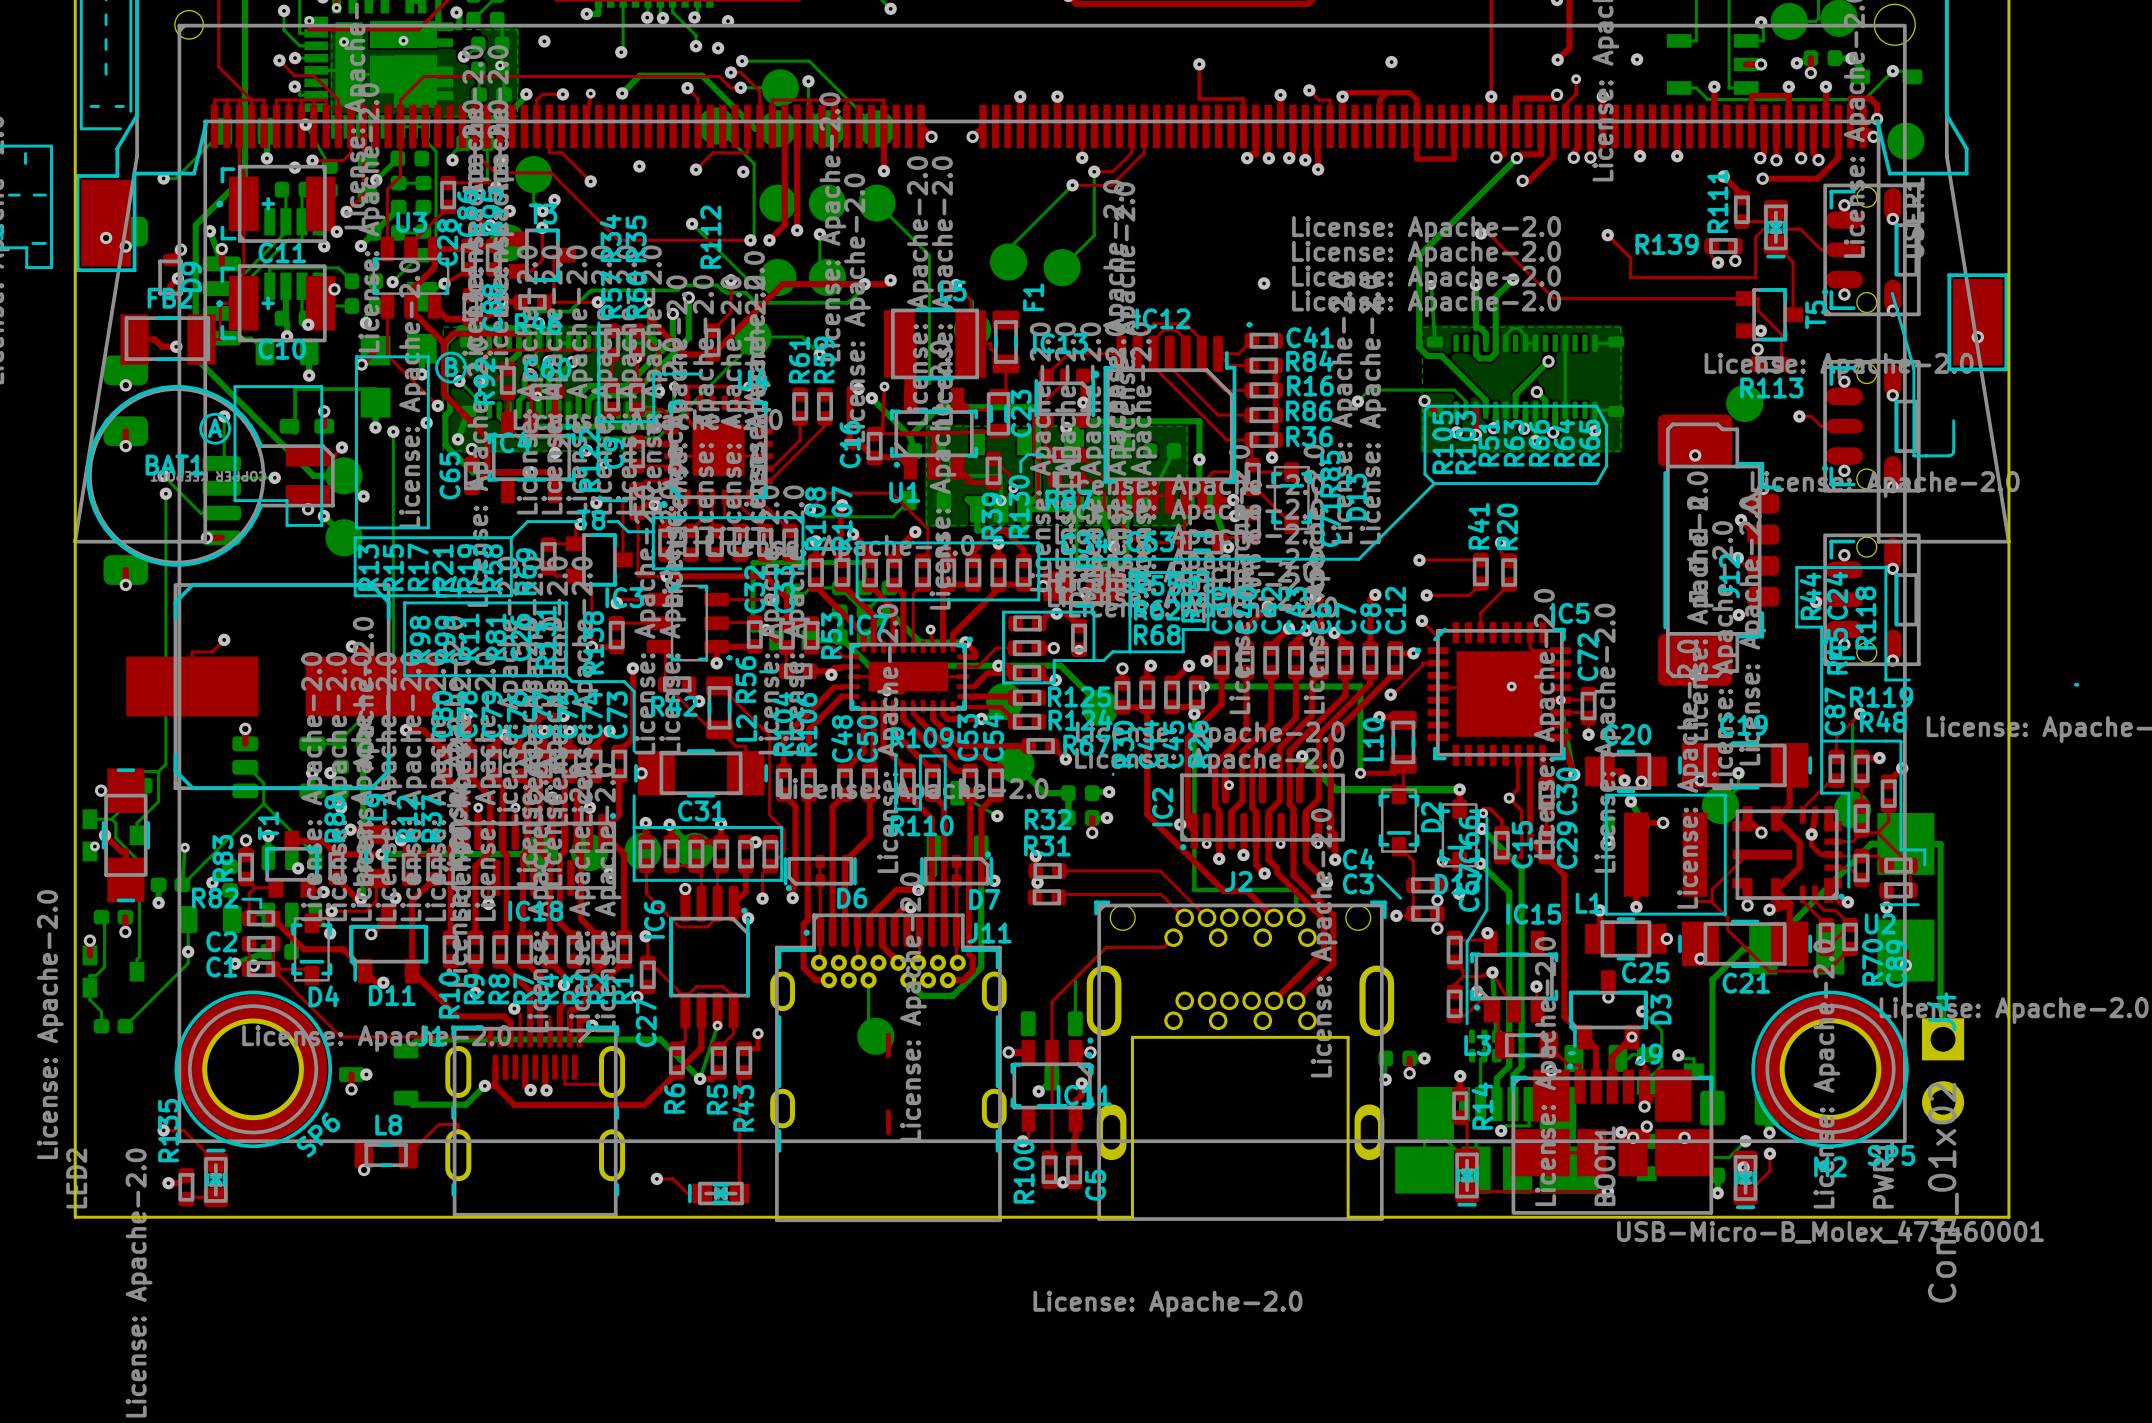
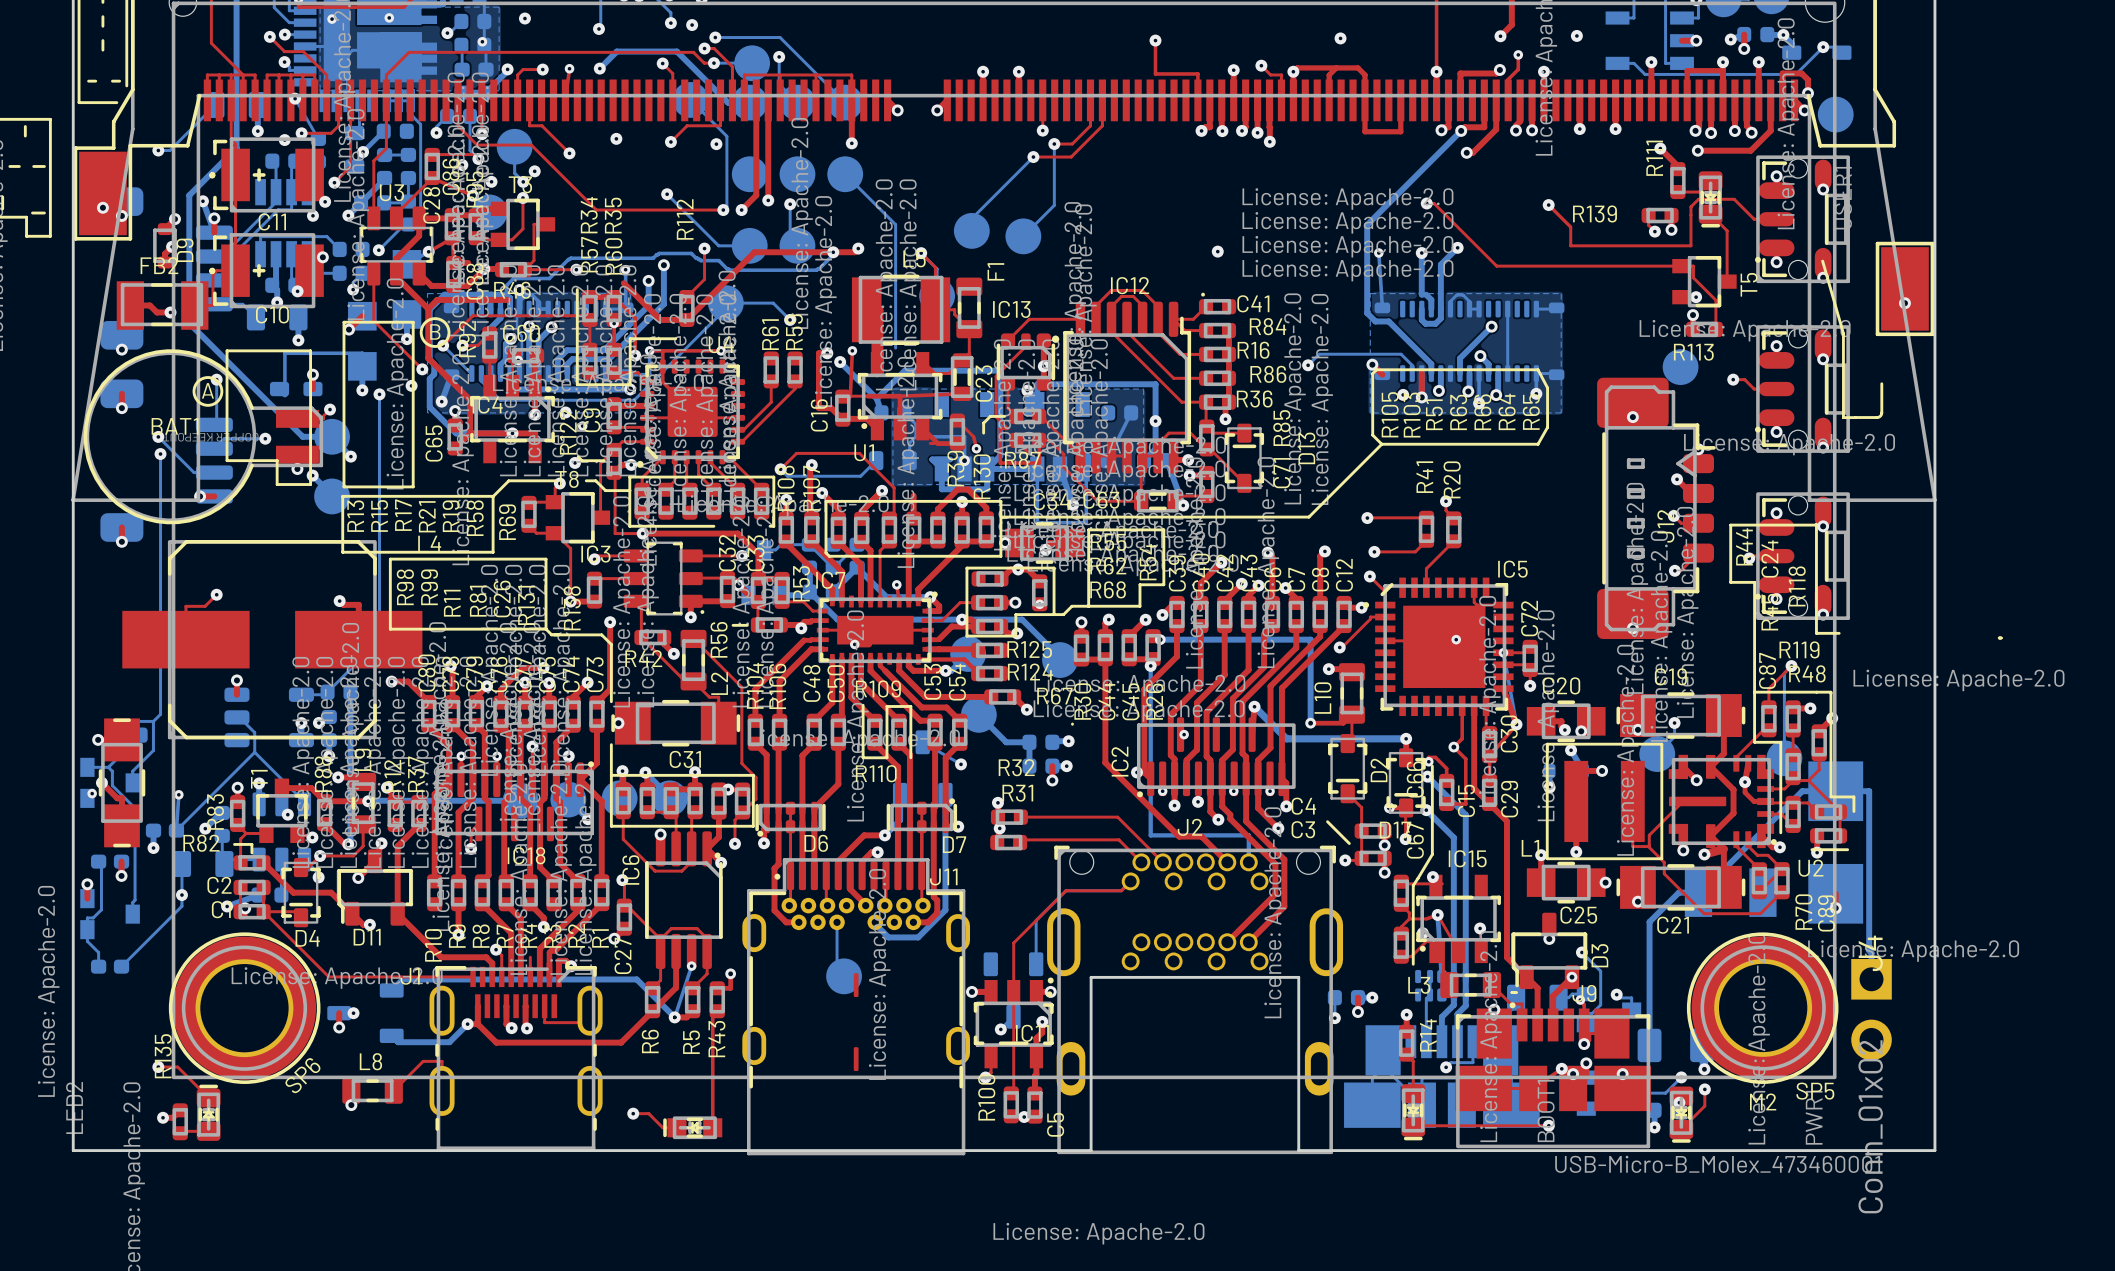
bottom track: (864, 587) (864, 562) (753, 562) (753, 630) (766, 630) -> none

